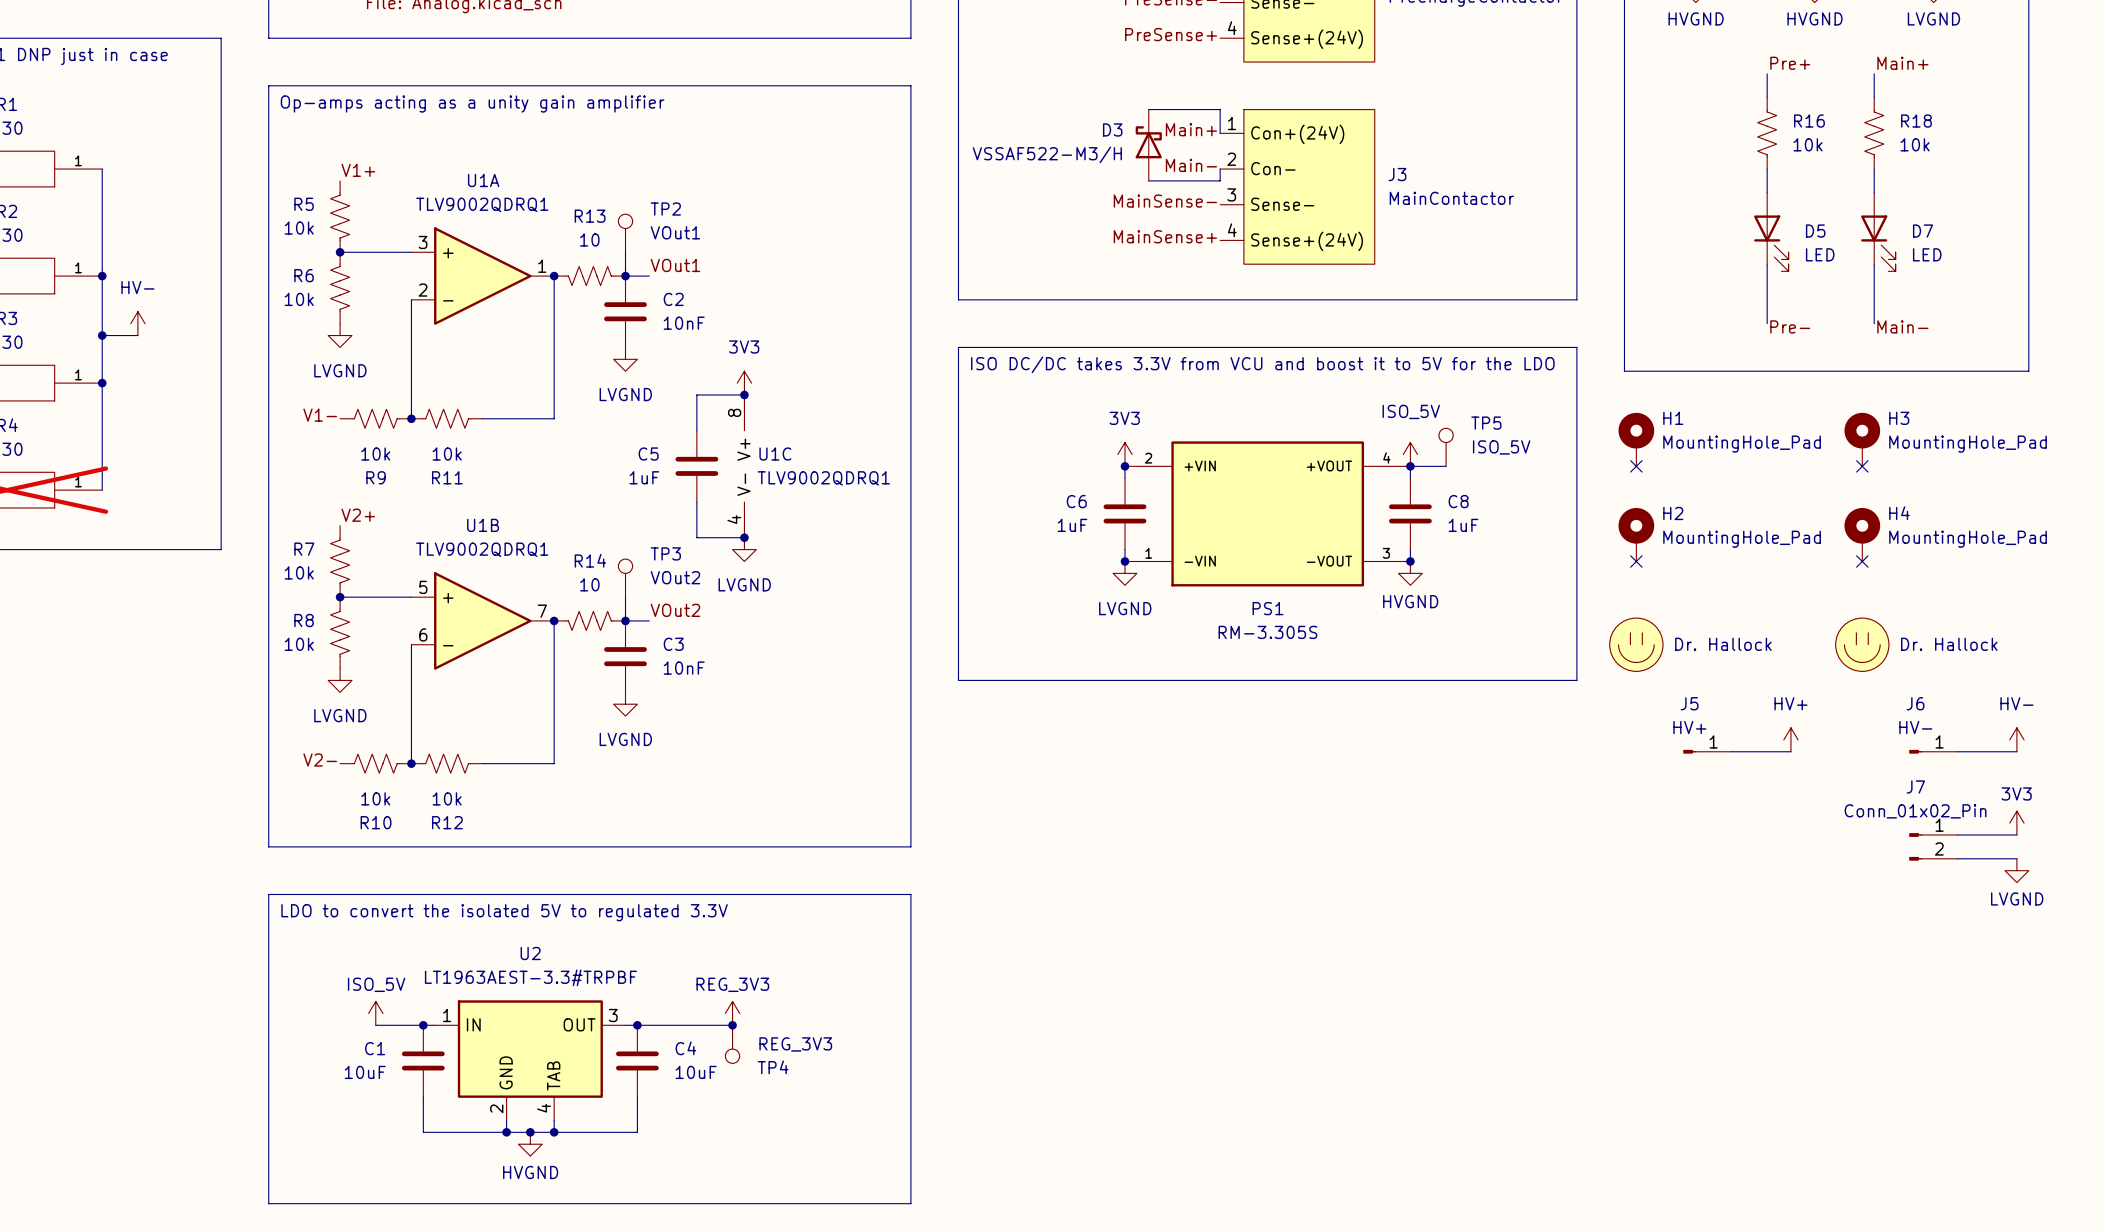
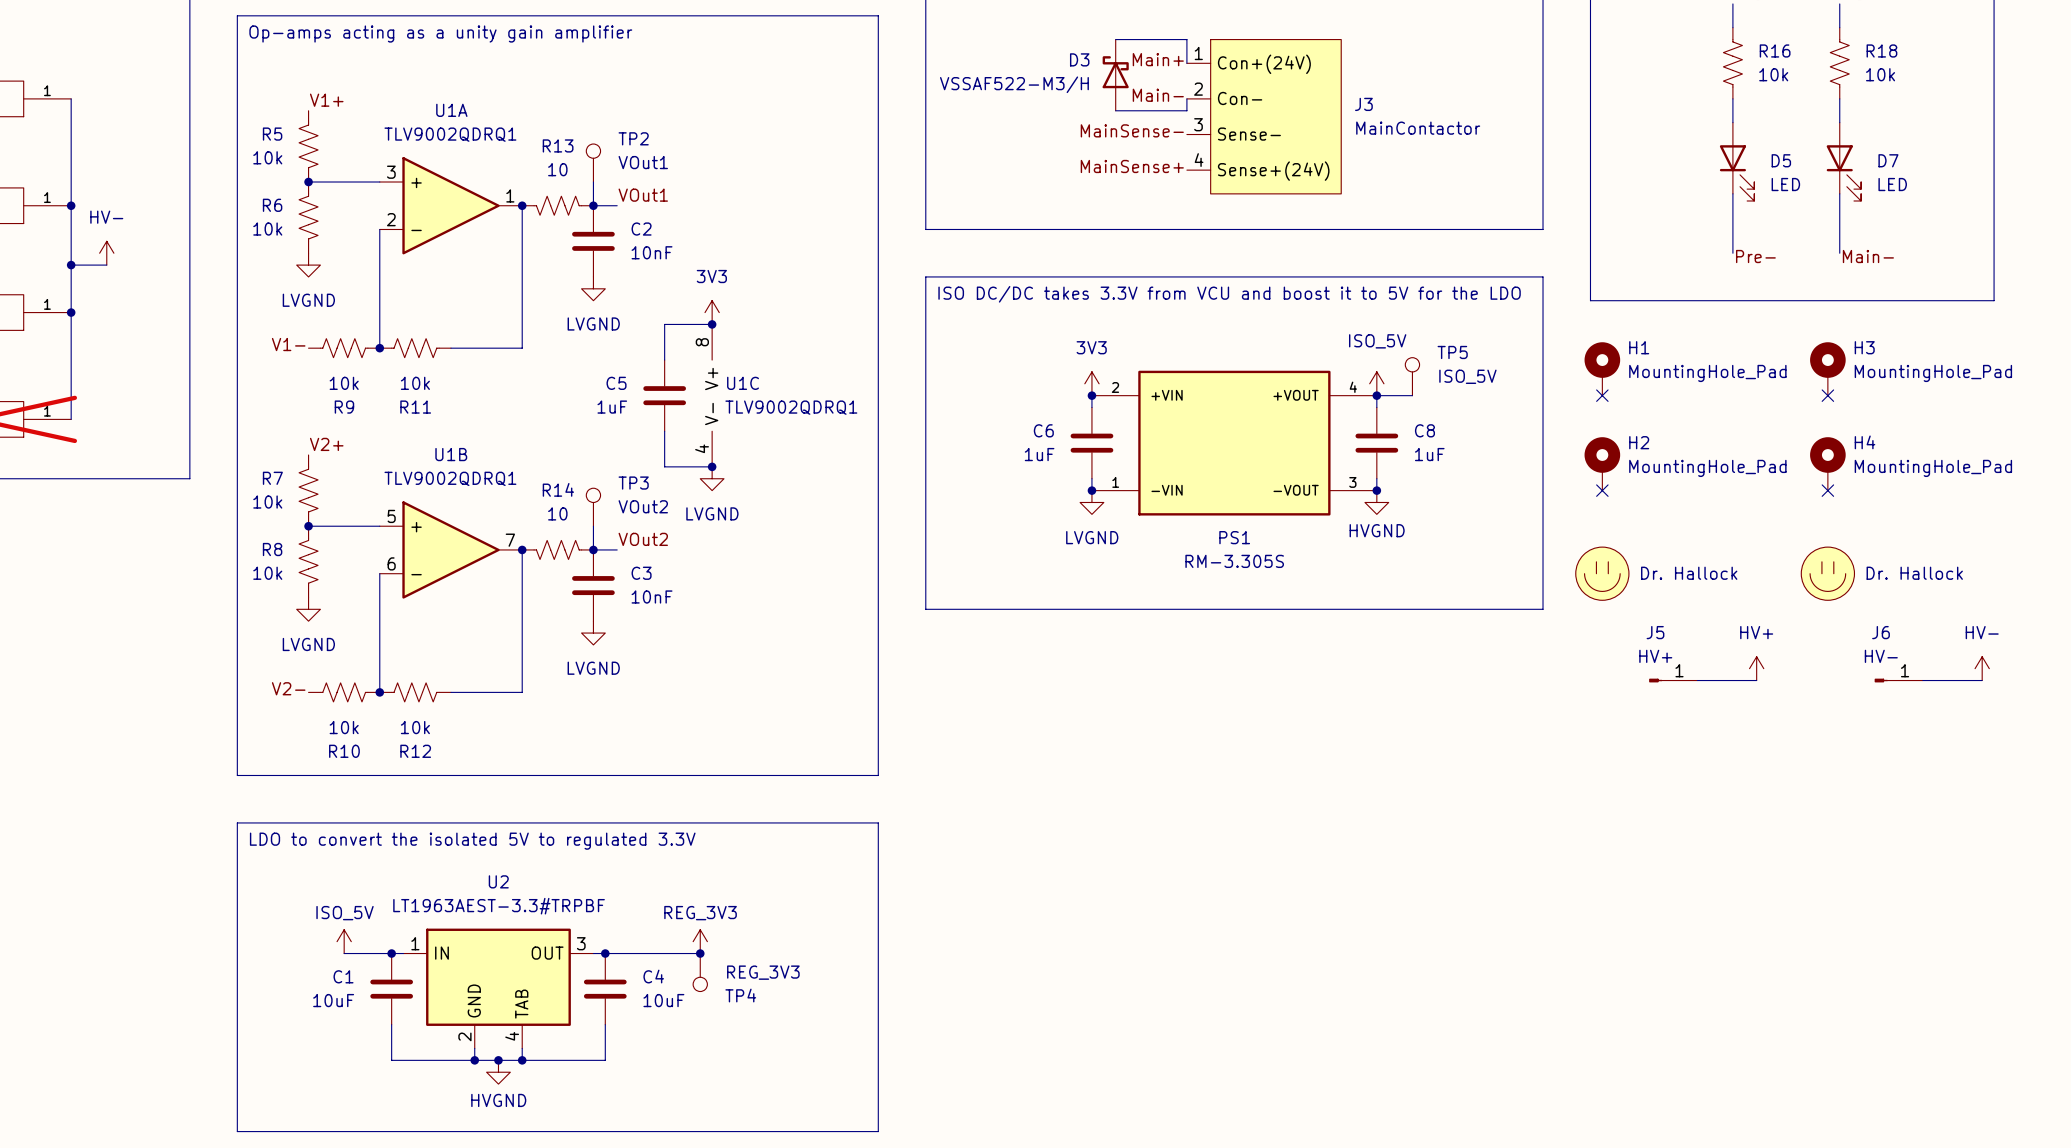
power symbol: 3V3 (2016, 823) -> none
wire: (1957, 835) (2016, 835) -> none
J7: Conn_01x02_Pin (1933, 846) -> none
wire: (1957, 858) (2016, 858) -> none
power symbol: LVGND (2016, 870) -> none

